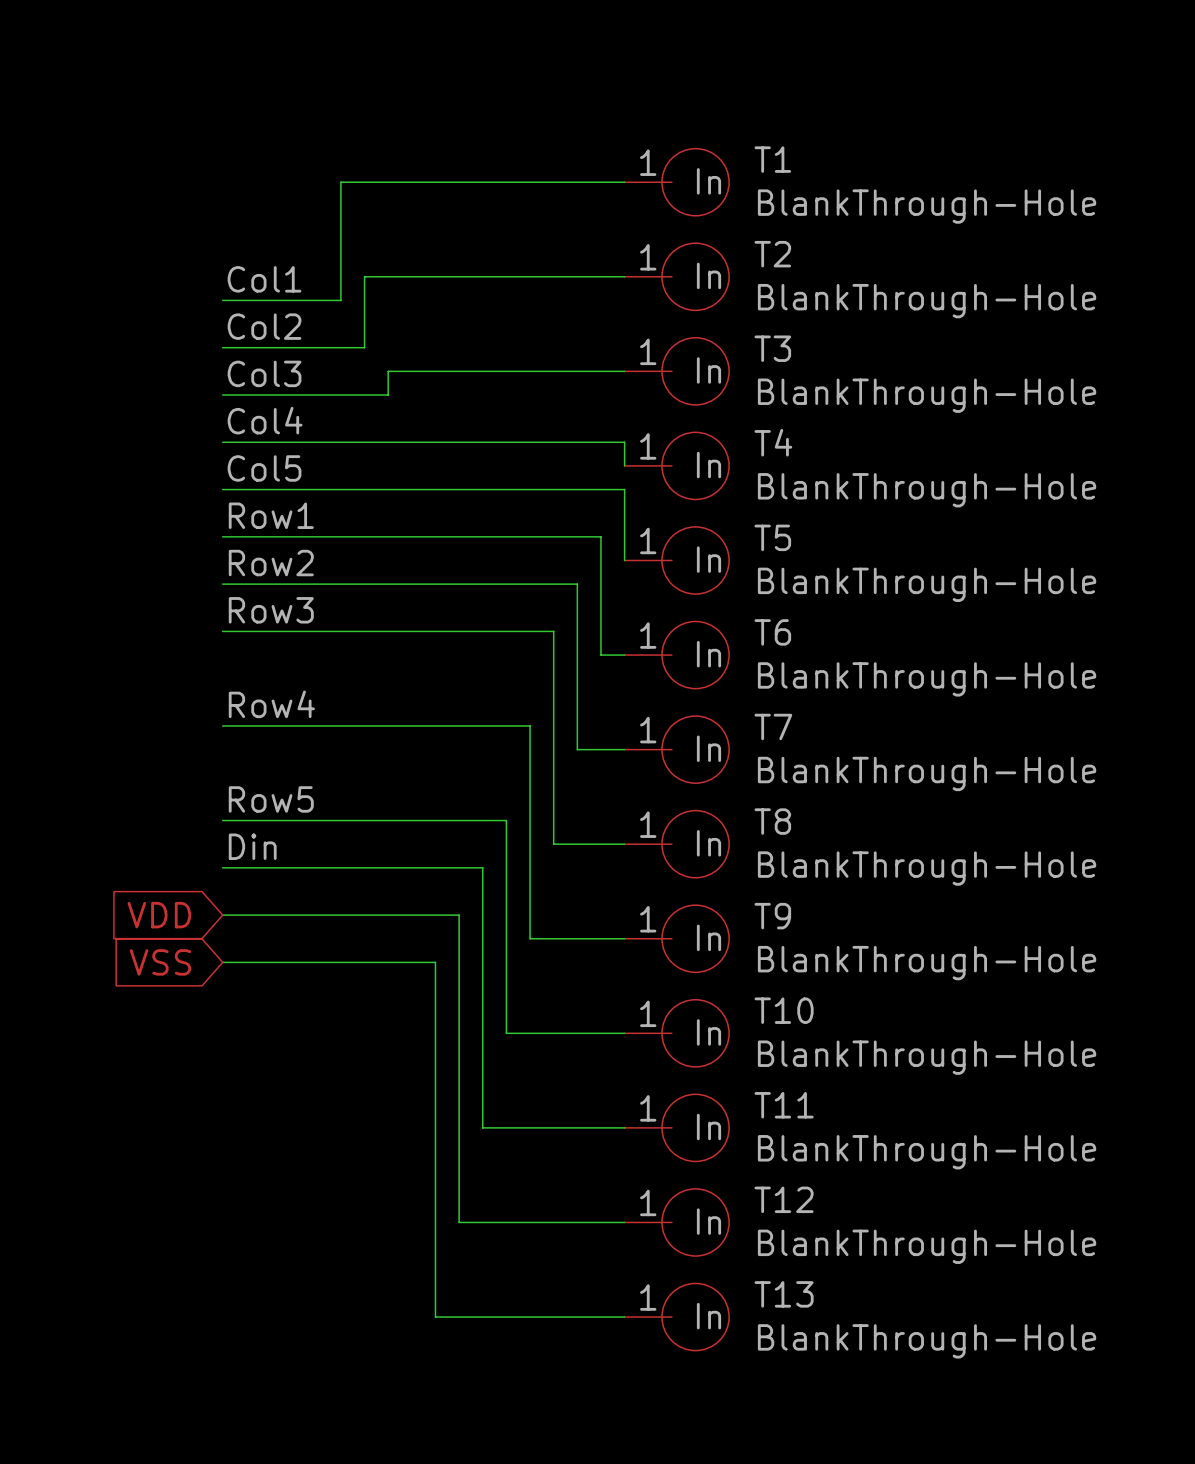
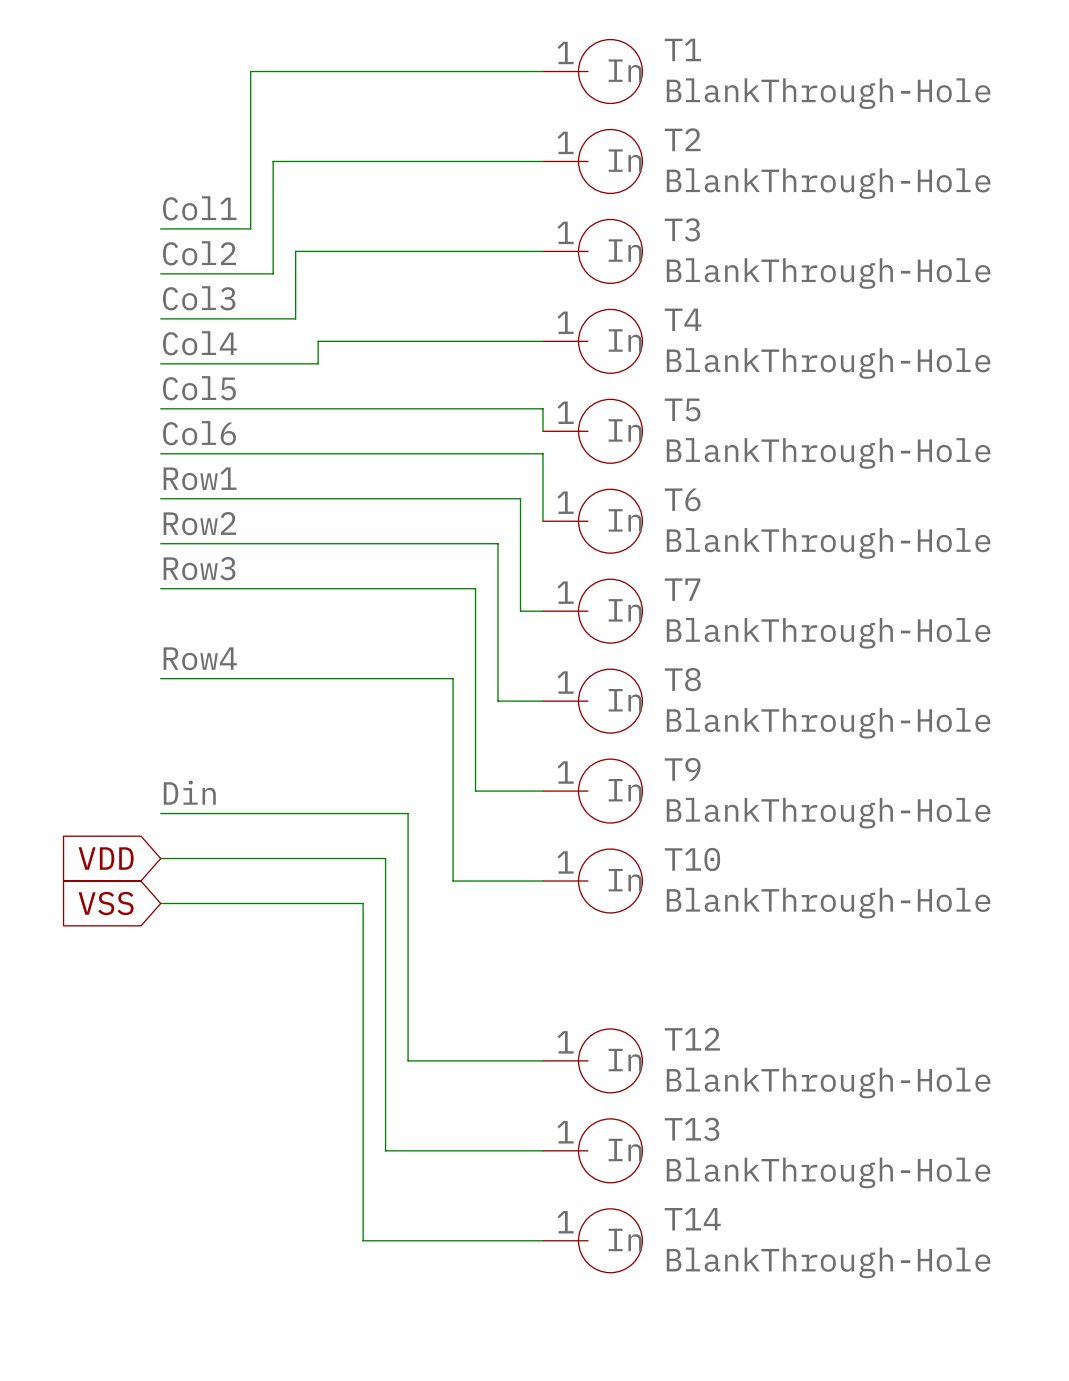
wire: none -> (542, 71) (250, 71) (250, 228) (160, 228)
T1: none -> BlankThrough-Hole (592, 71)
T1 name: T1 (772, 159) -> T2 (682, 139)
label: none -> Col1 (199, 208)
T2 name: T2 (772, 254) -> T3 (682, 229)
label: Col1 (264, 279) -> Col2 (199, 253)
label: Col2 (264, 326) -> Col3 (199, 298)
T3 name: T3 (772, 348) -> T4 (683, 319)
label: Col3 (264, 373) -> Col4 (199, 343)
label: Col4 (265, 420) -> Col5 (199, 388)
T4 name: T4 (773, 442) -> T5 (682, 409)
label: Col5 (264, 468) -> Col6 (199, 433)
T5 name: T5 (772, 537) -> T6 (682, 499)
T6 name: T6 (772, 632) -> T7 (682, 589)
T7 name: T7 (773, 726) -> T8 (682, 679)
label: Row5 (271, 799) -> none
wire: (222, 820) (506, 820) (506, 1033) (624, 1033) -> none
T8 name: T8 (772, 821) -> T9 (682, 769)
T9 name: T9 (772, 916) -> T10 (692, 859)
T10: BlankThrough-Hole (676, 1033) -> none
T11 name: T11 (784, 1105) -> T12 (692, 1039)
T12 name: T12 (784, 1199) -> T13 (692, 1129)
T13 name: T13 (784, 1294) -> T14 (692, 1219)

